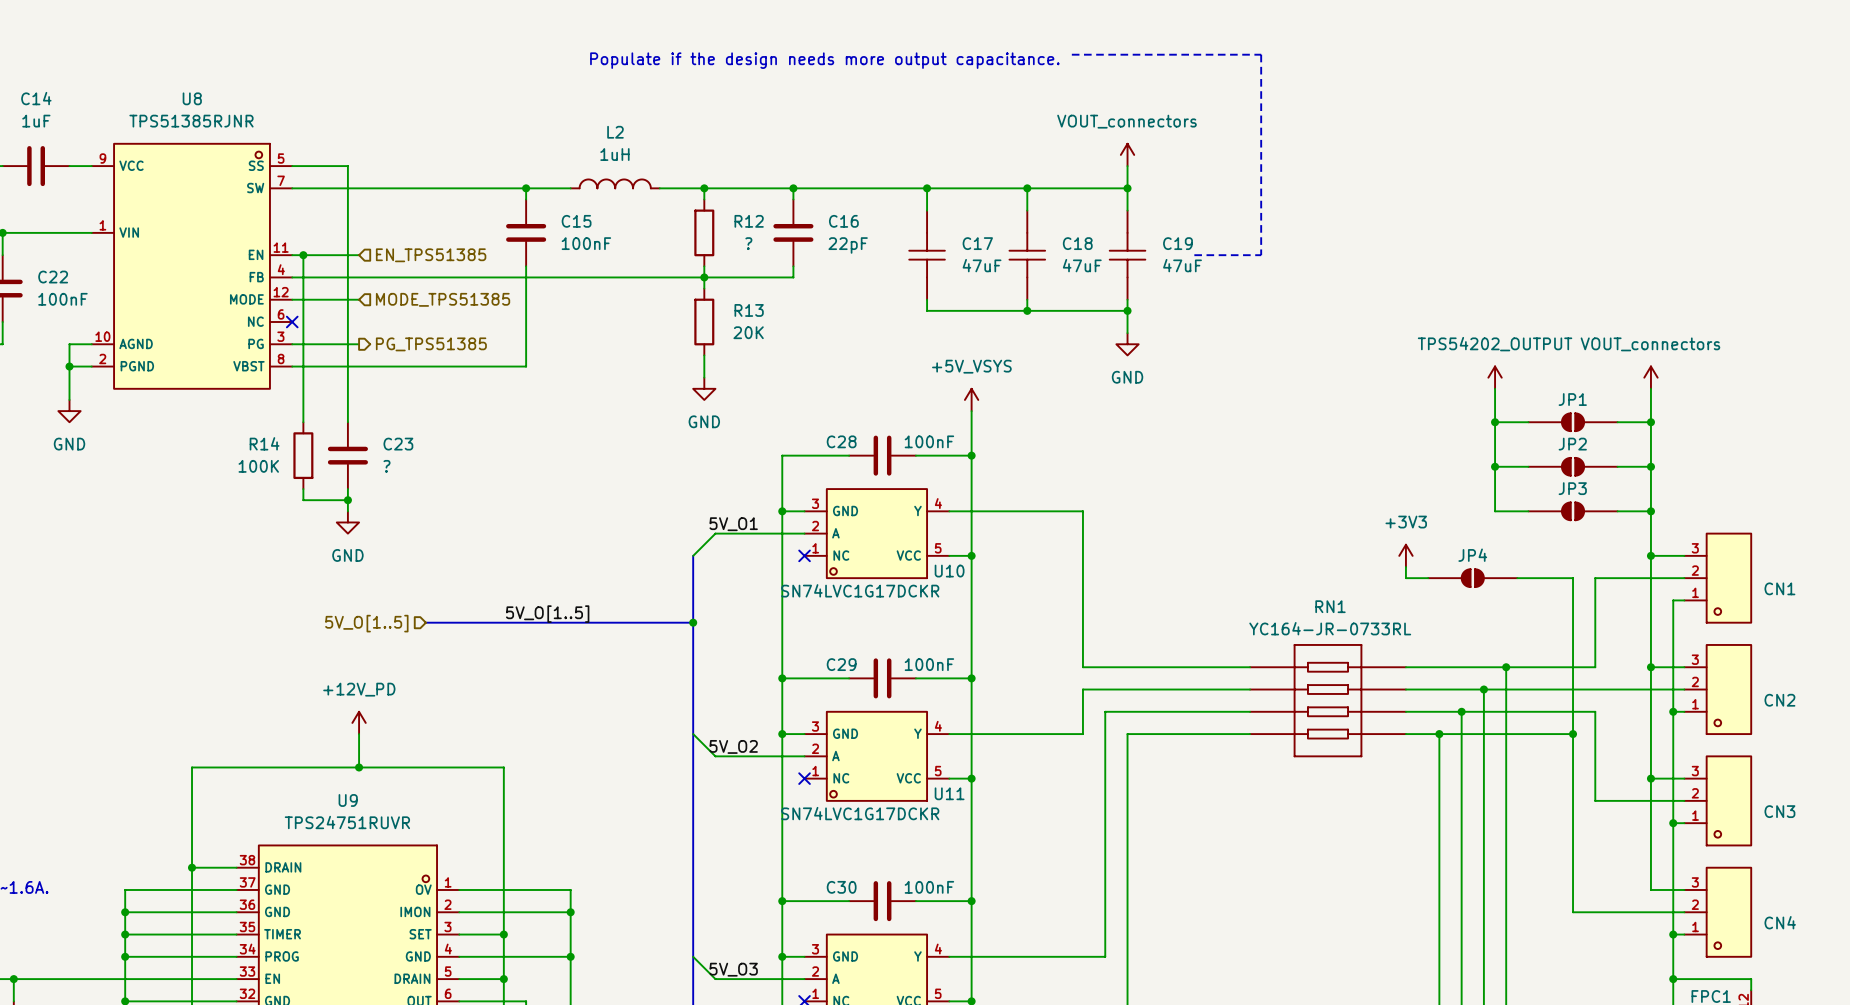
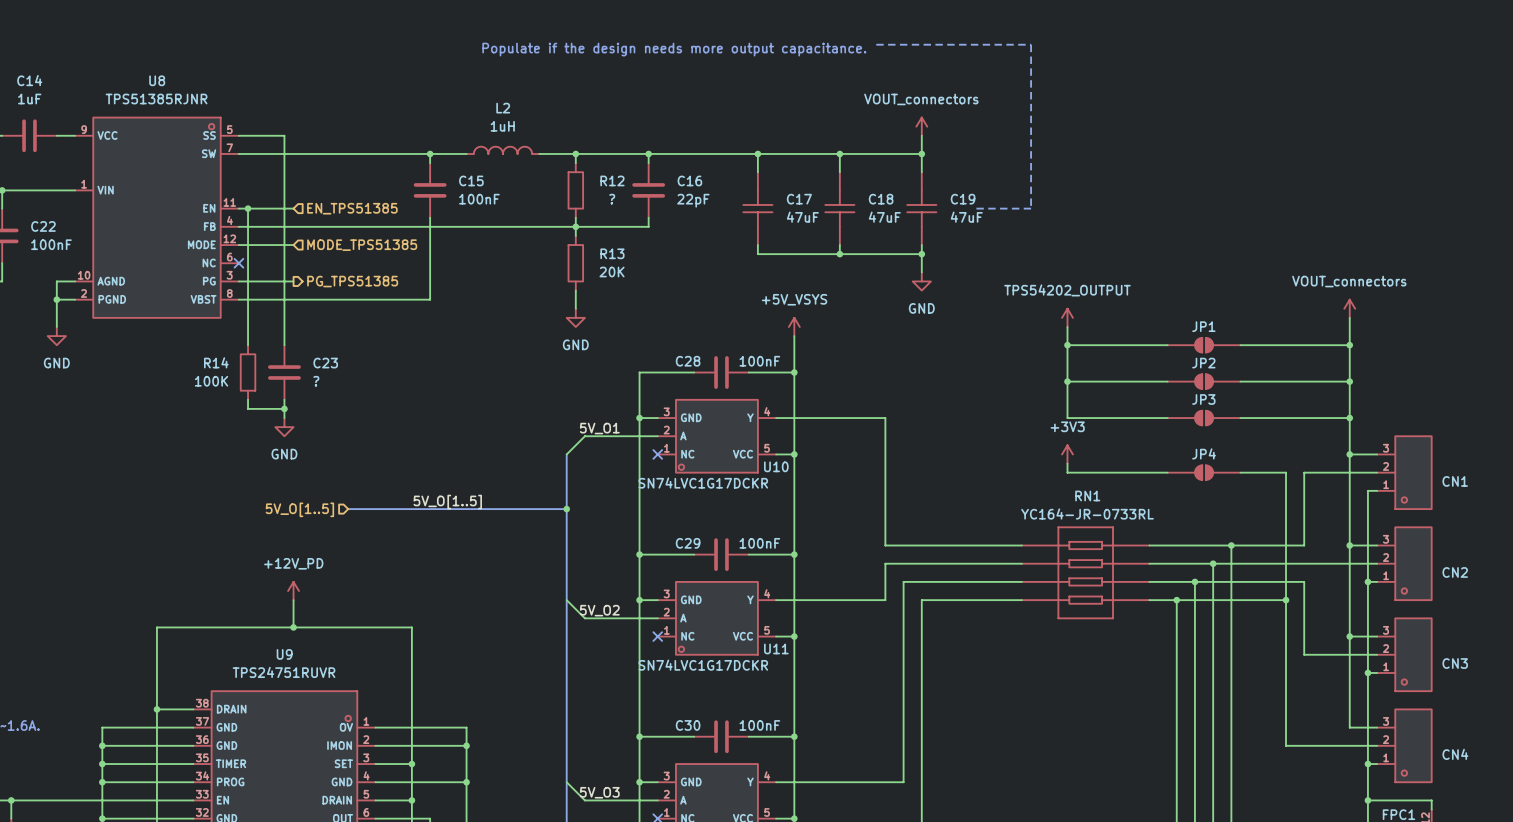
power symbol position: TPS54202_OUTPUT (1495, 377) -> TPS54202_OUTPUT (1067, 317)
wire: (1495, 388) (1495, 511) (1517, 511) -> none
wire: none -> (1067, 326) (1067, 418) (1167, 418)
wire: none -> (1067, 345) (1167, 345)
junction: none -> (1067, 345)
junction: (1495, 422) -> none
JP1 position: (1573, 422) -> (1204, 345)
wire: none -> (1067, 381) (1167, 381)
junction: none -> (1067, 381)
junction: (1495, 466) -> none
JP2 position: (1573, 466) -> (1204, 381)
JP3 position: (1573, 511) -> (1204, 418)
power symbol position: +3V3 (1405, 555) -> +3V3 (1067, 454)
wire: (1405, 567) (1405, 578) -> (1067, 463) (1067, 472) (1149, 472)

